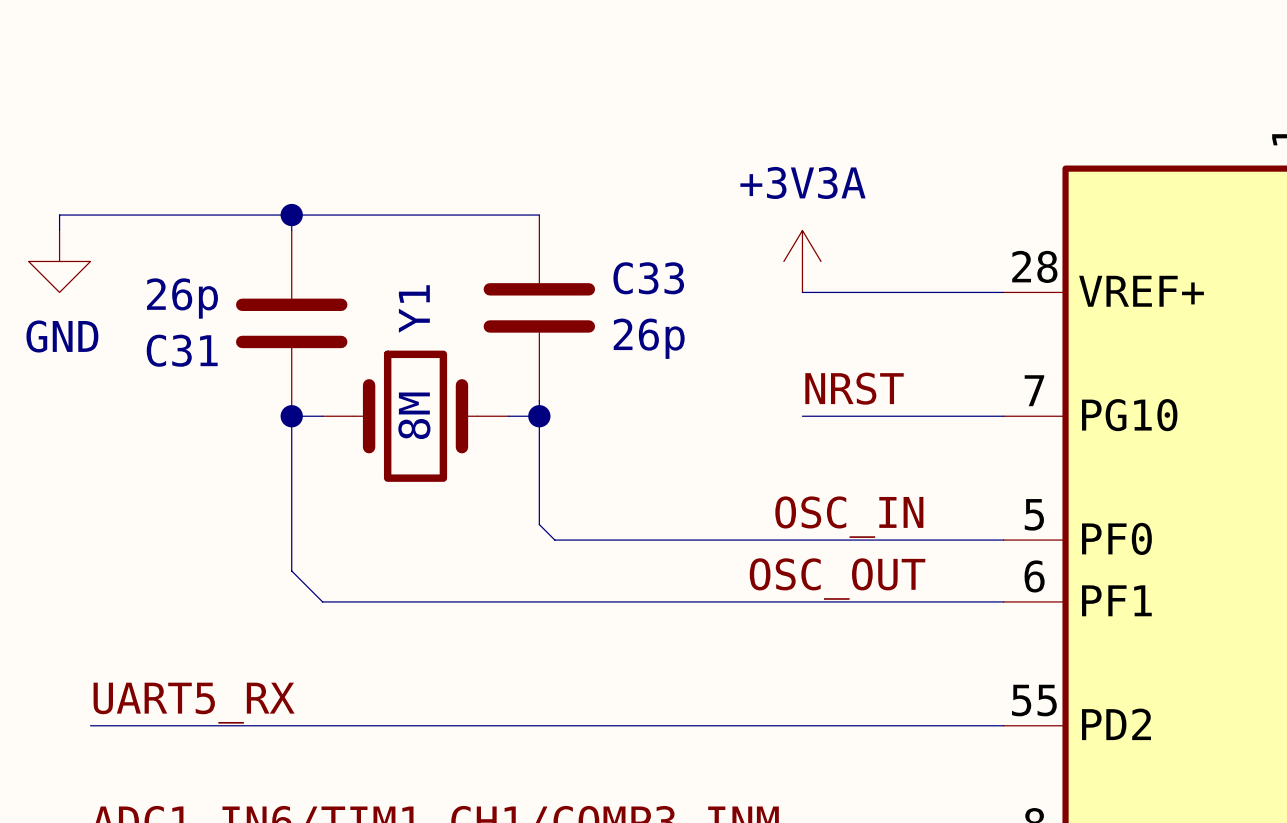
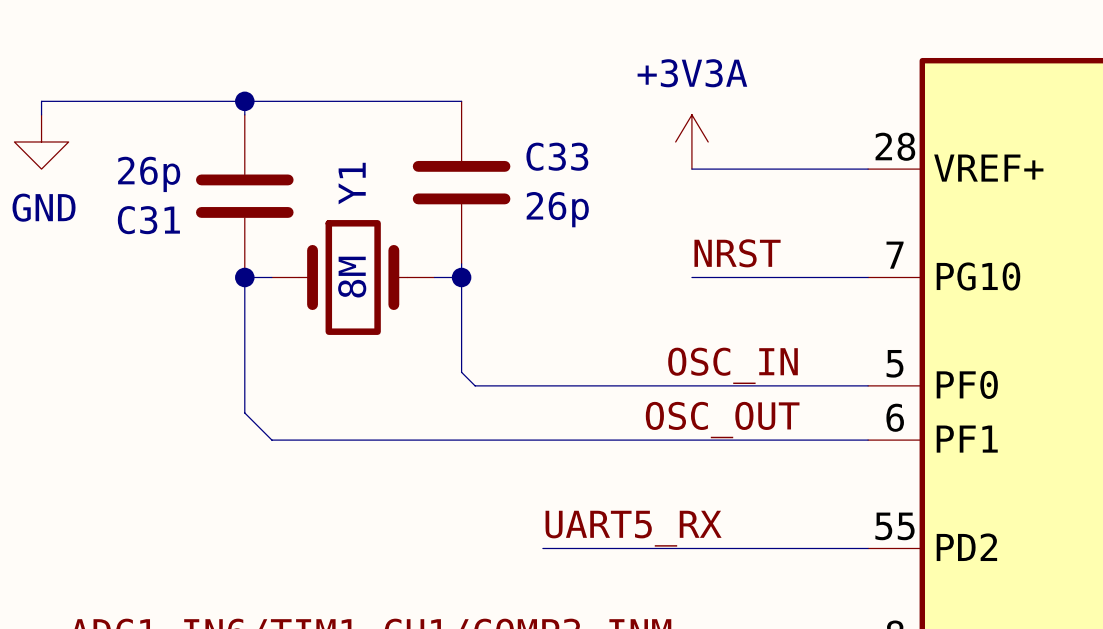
label position: UART5_RX (194, 703) -> UART5_RX (633, 528)
wire: (90, 725) (632, 725) -> none

